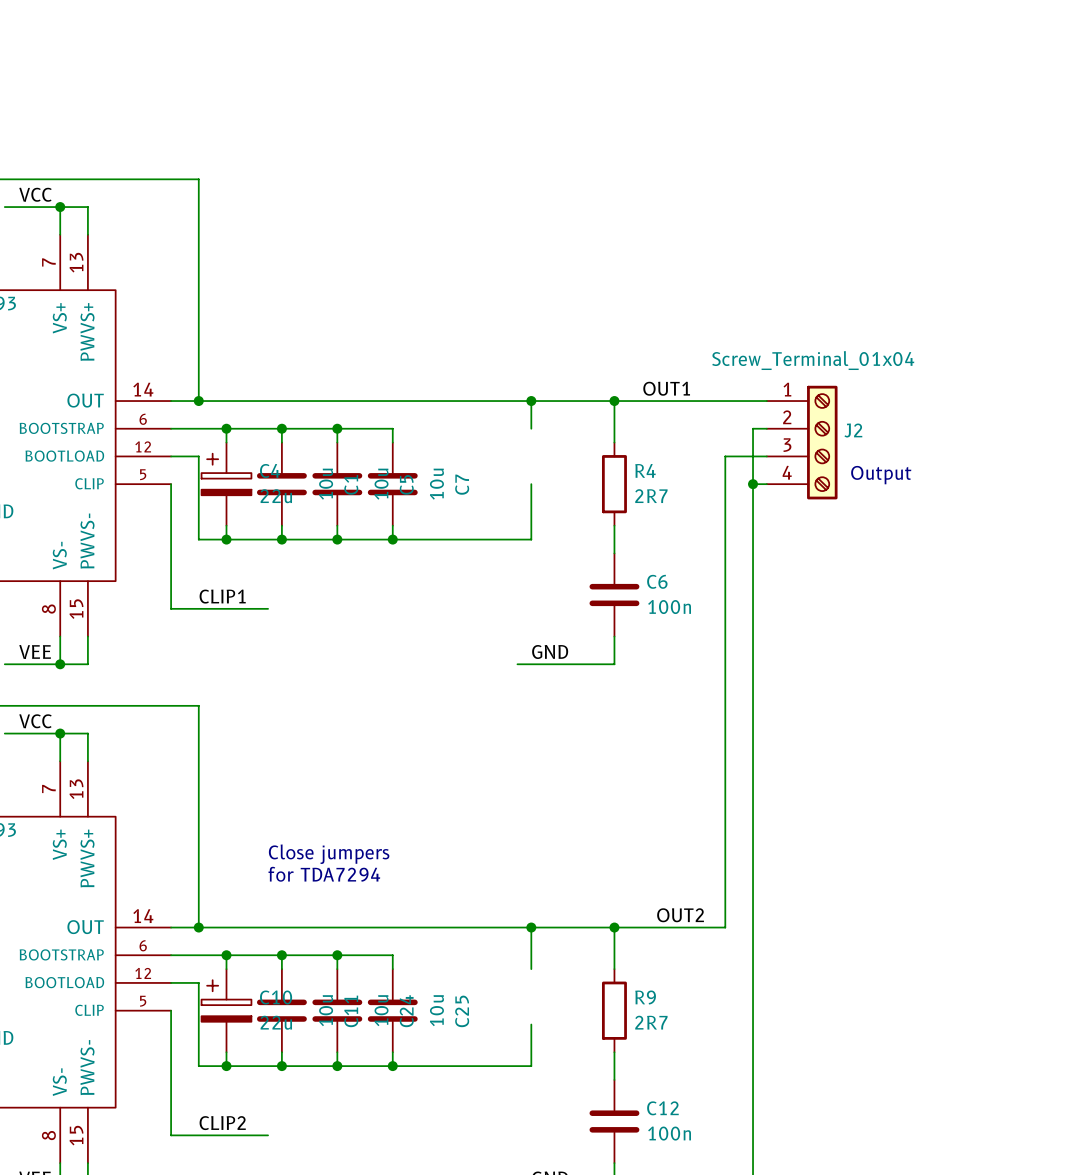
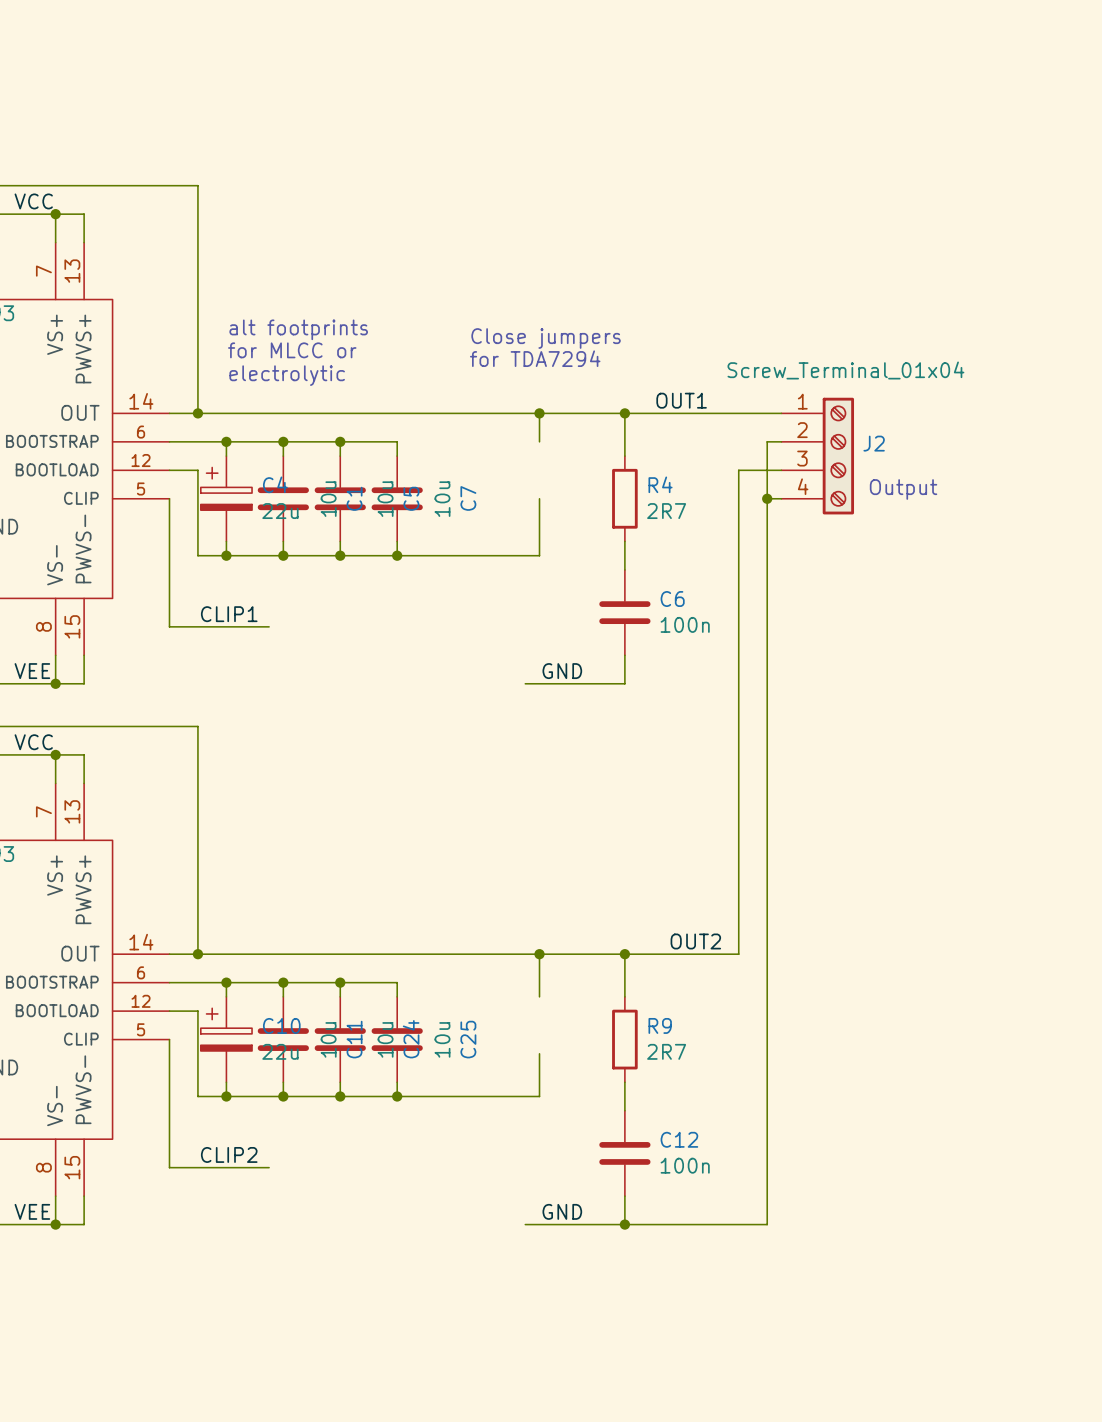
text: none -> alt footprints (298, 329)
text: none -> Close jumpers (546, 338)
text: none -> for MLCC or (292, 350)
text: none -> for TDA7294 (535, 358)
text: none -> electrolytic (287, 375)
text: Close jumpers (329, 854) -> none
text: for TDA7294 (324, 874) -> none

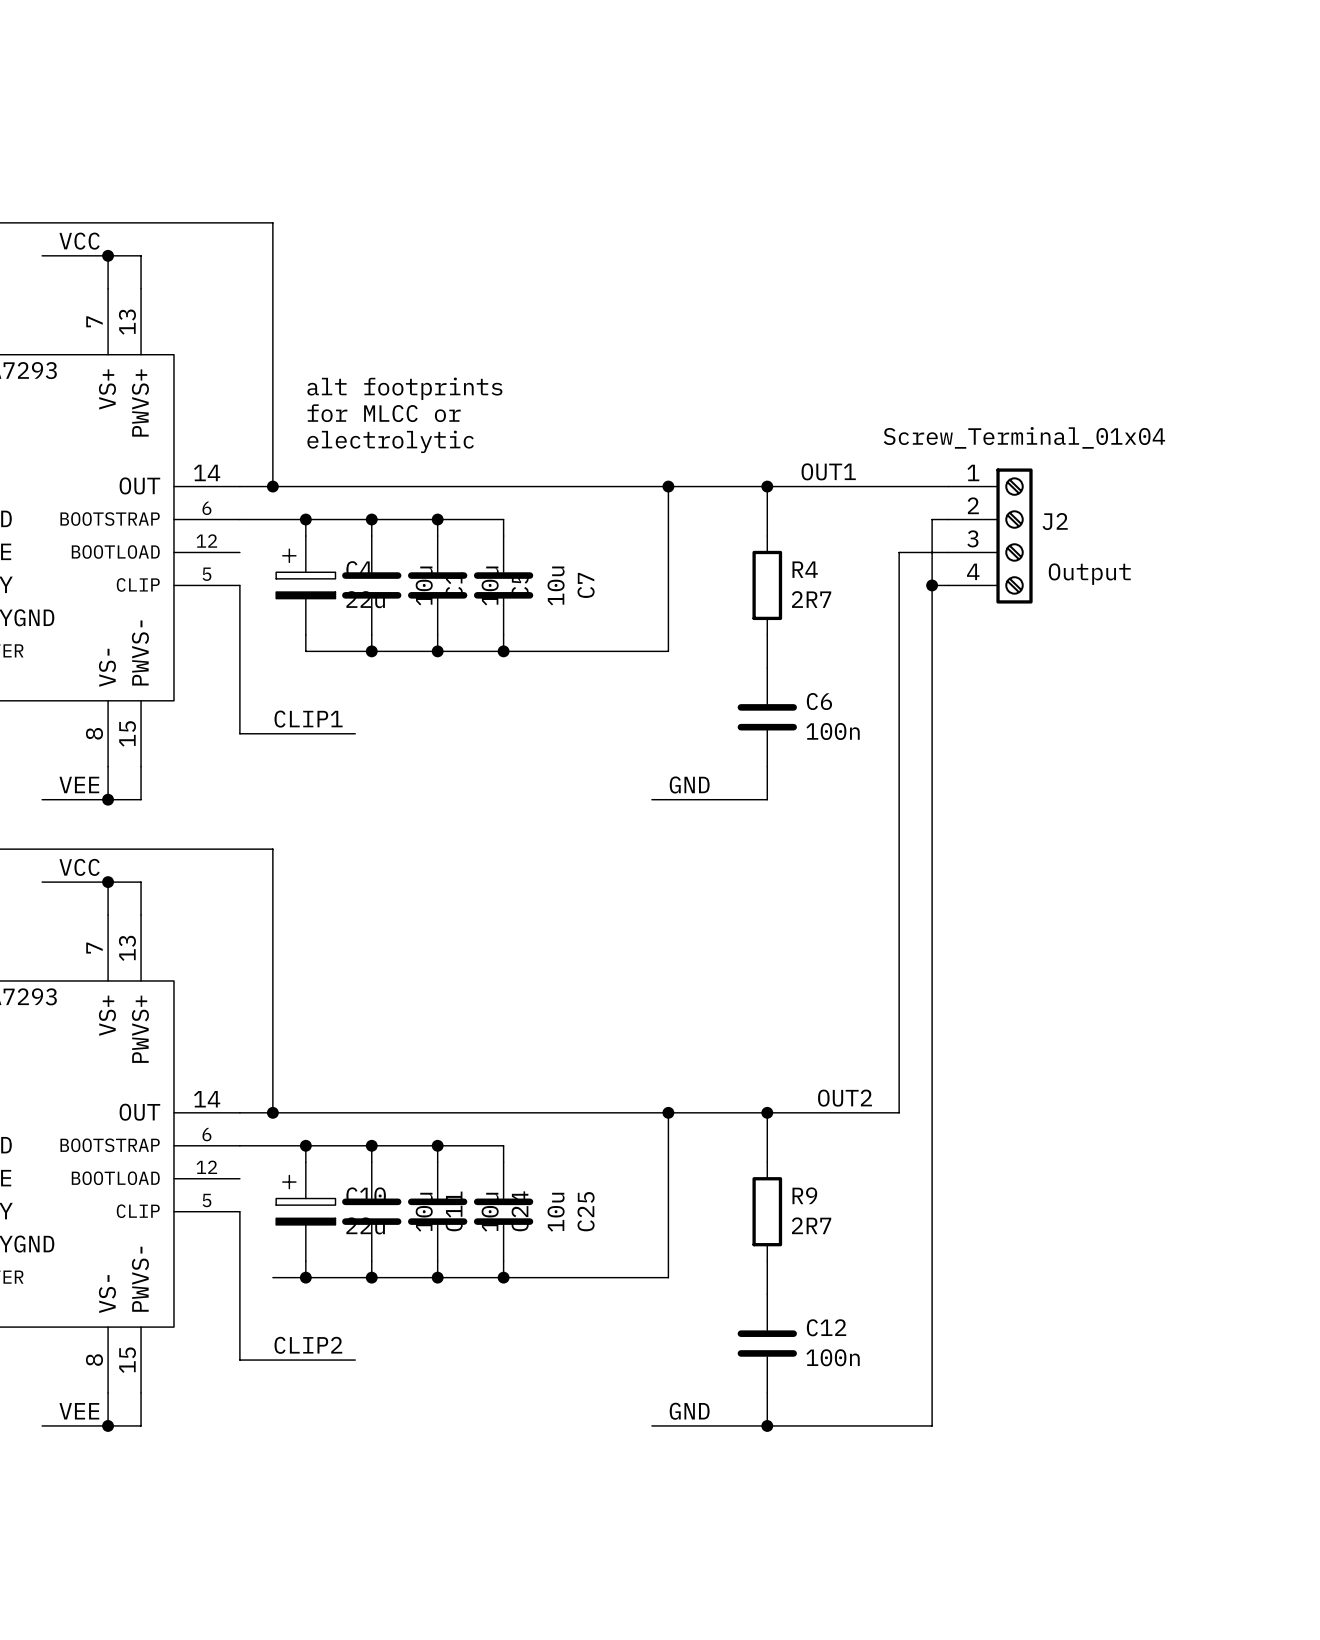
text: Close jumpers (546, 338) -> none
text: for TDA7294 (535, 358) -> none
wire: none -> (668, 519) (668, 585)
wire: (169, 470) (197, 470) (197, 555) (226, 555) -> none
junction: (226, 555) -> none
wire: none -> (668, 1162) (668, 1228)
wire: (169, 1011) (197, 1011) (197, 1096) -> none

